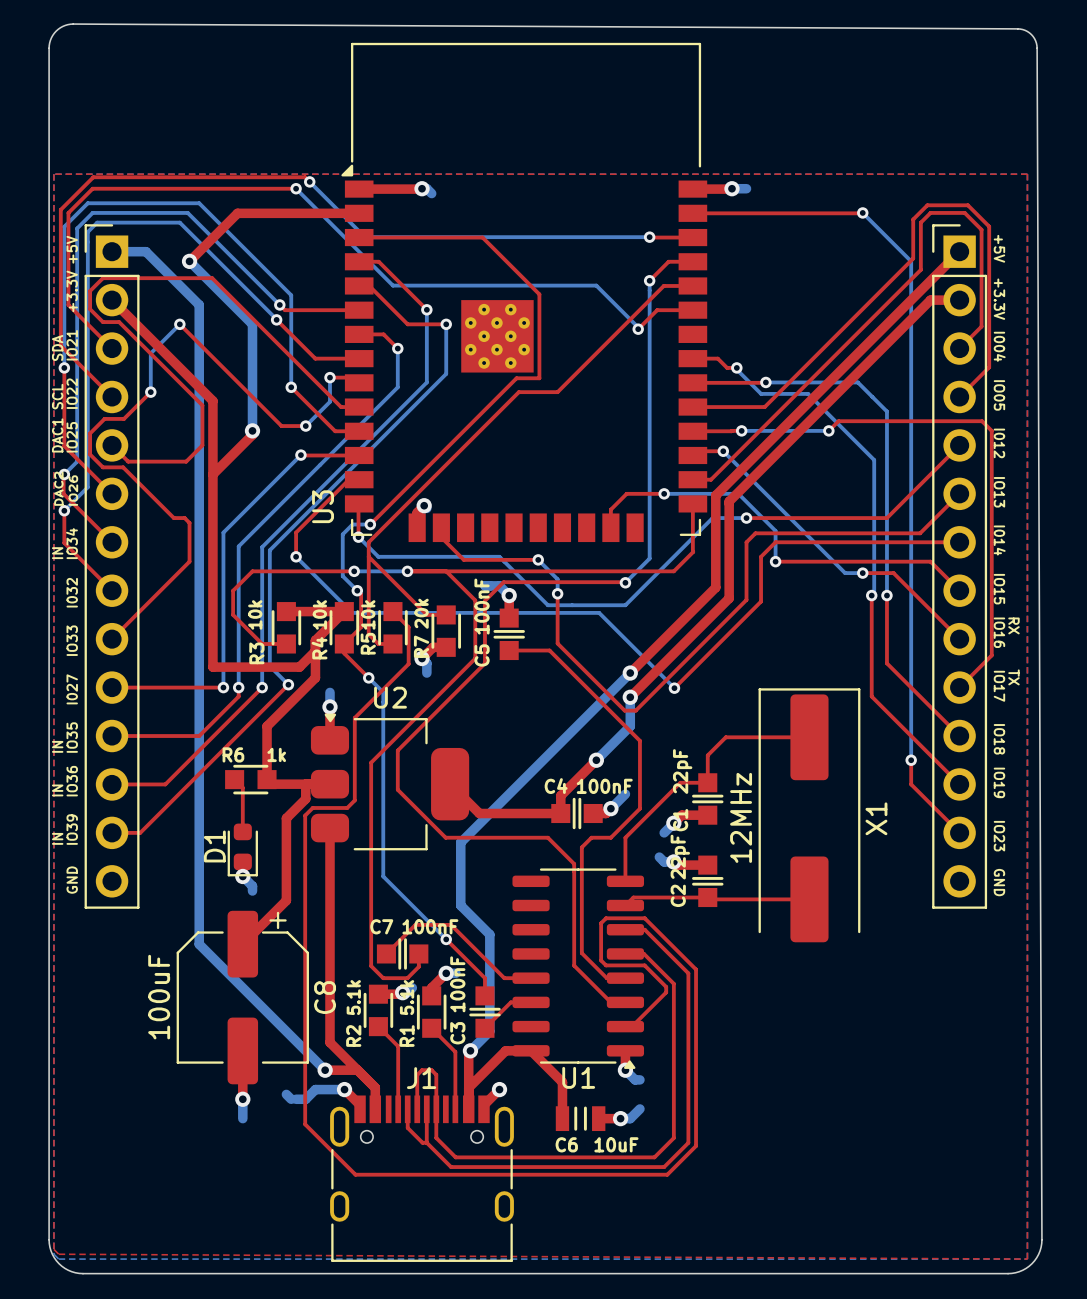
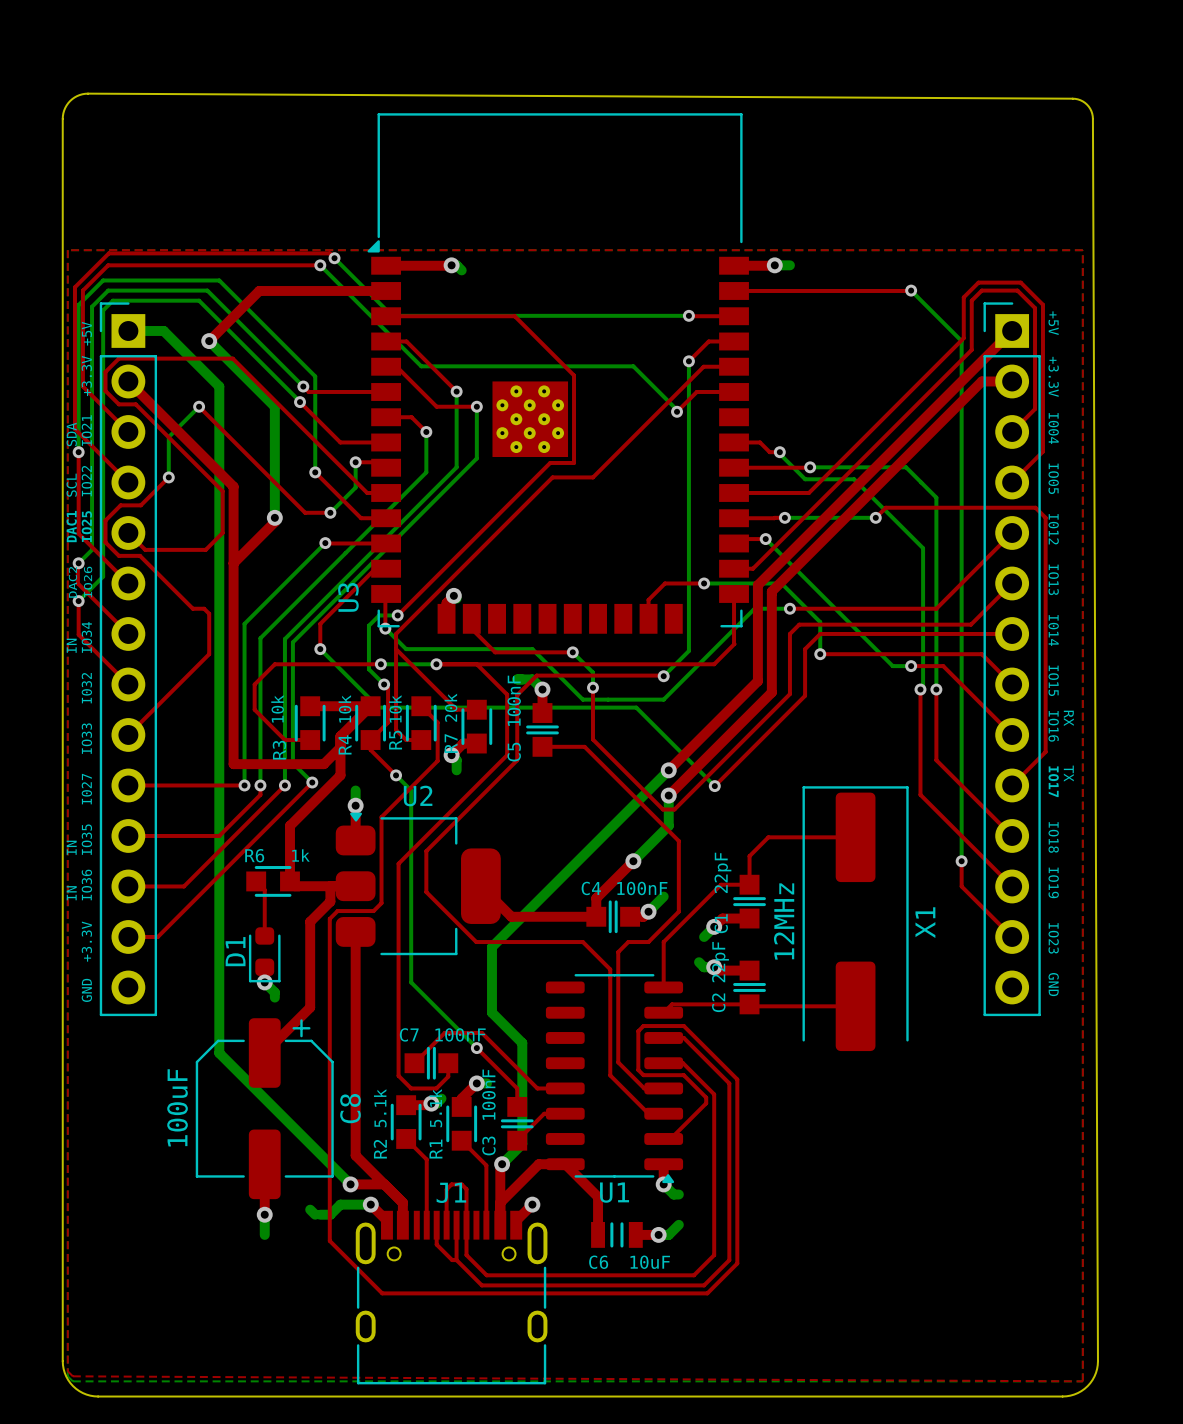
text: IO39 (72, 829) -> none
text: none -> +3.3V (86, 941)
text: IN (57, 838) -> none

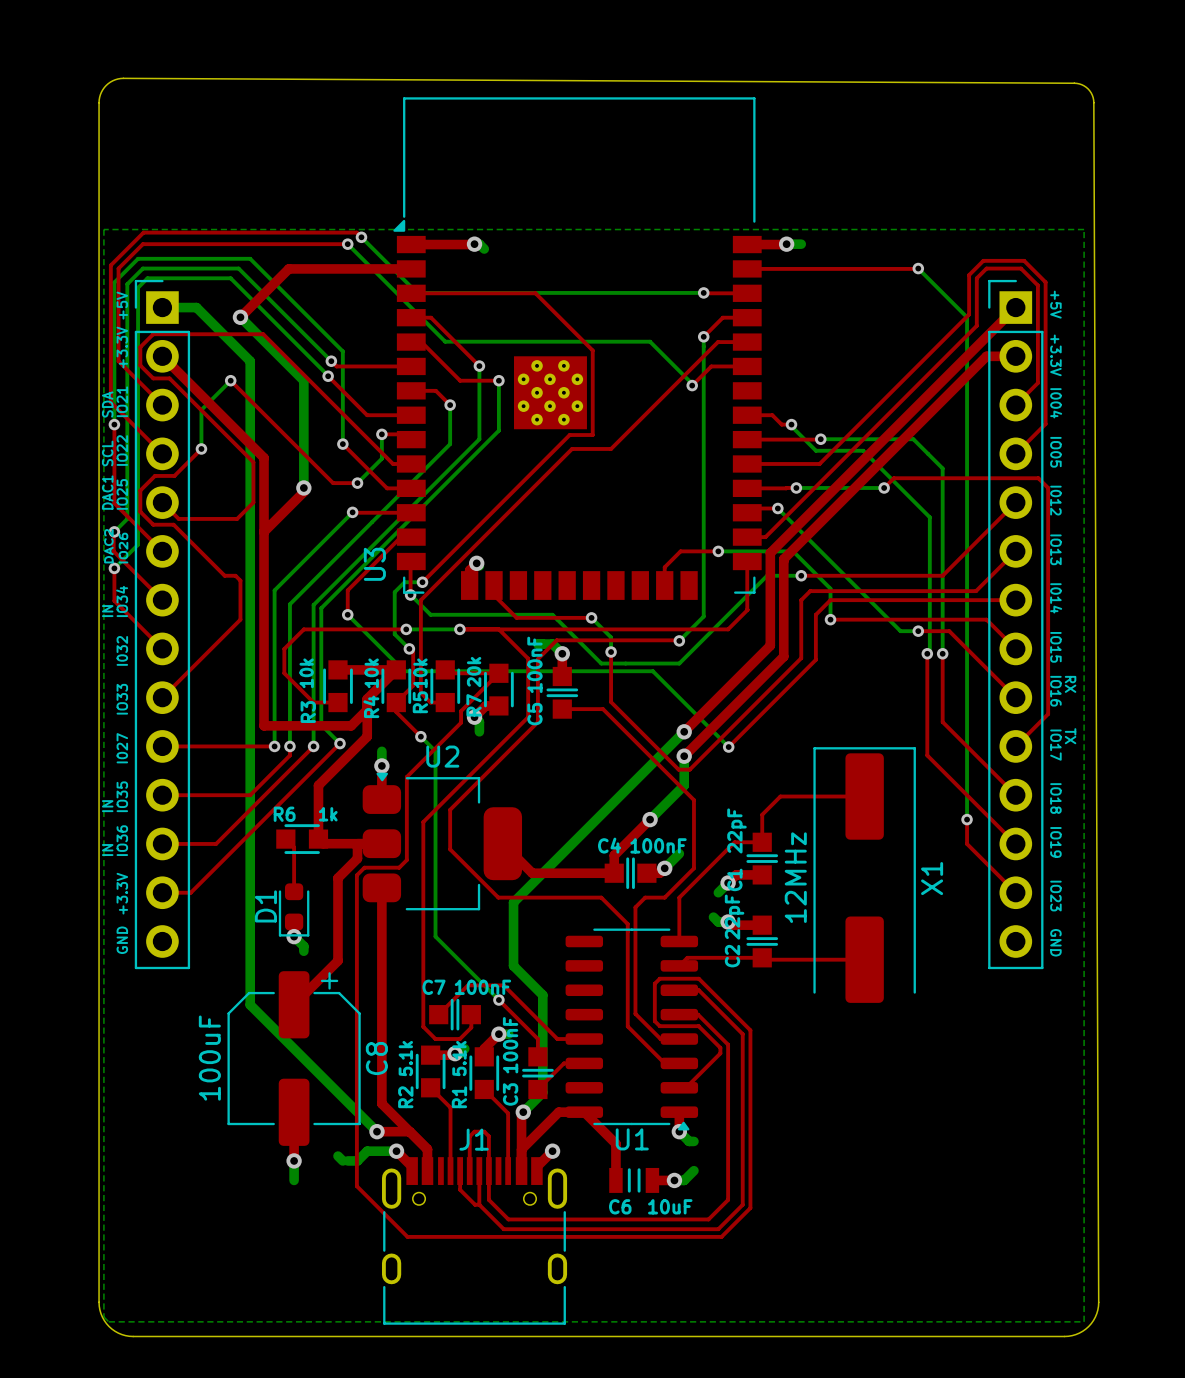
top zone outline: (67, 250) (1082, 250) (1082, 1381) (72, 1376) (67, 1371) (67, 250) -> none
top track: (396, 649) (456, 709) -> none
top track: (424, 709) (437, 722) (437, 748) -> (448, 673) (479, 673)
top track: none -> (498, 673) (461, 711)

